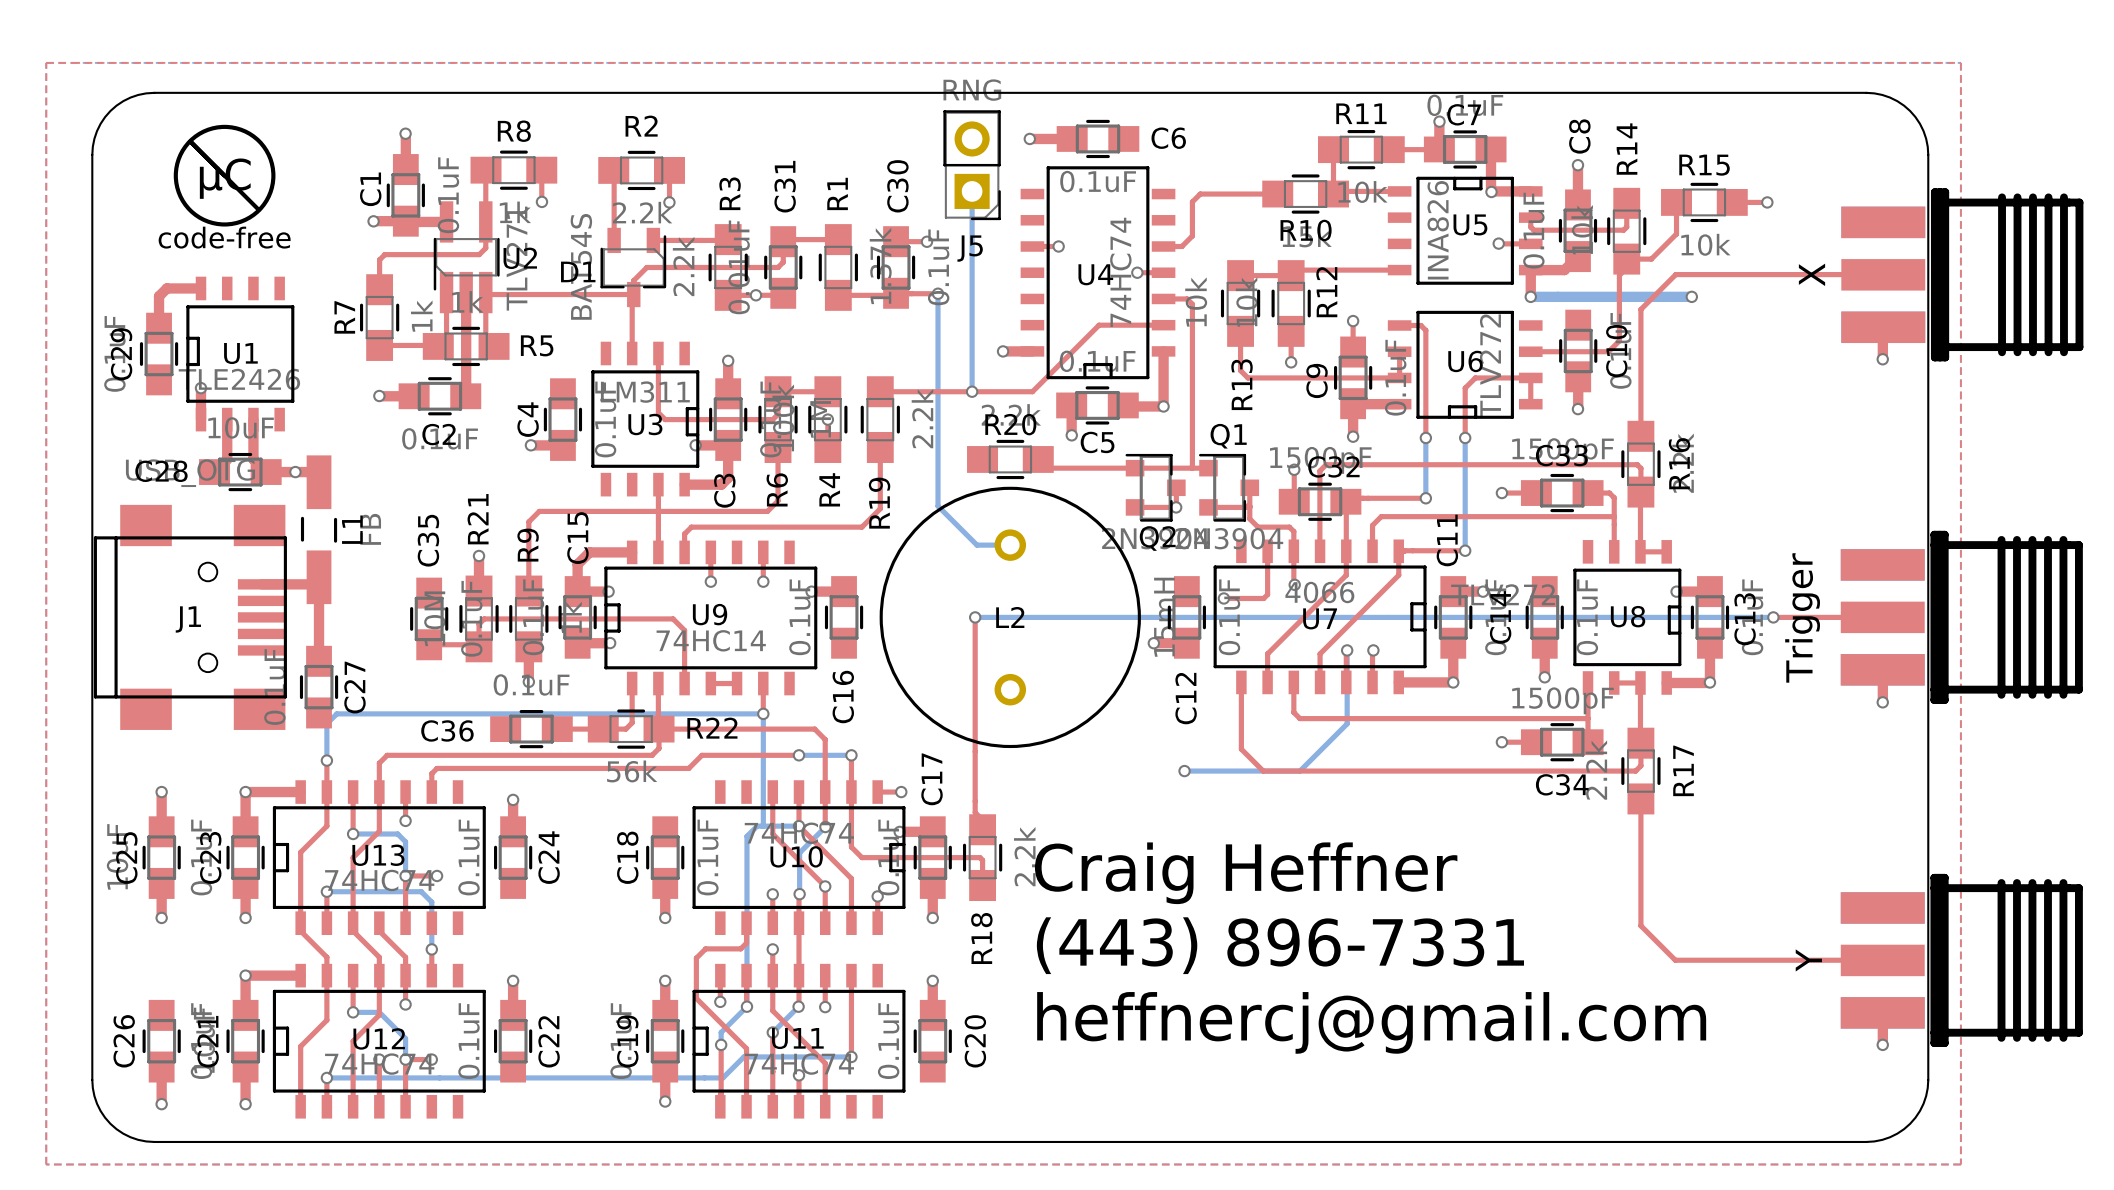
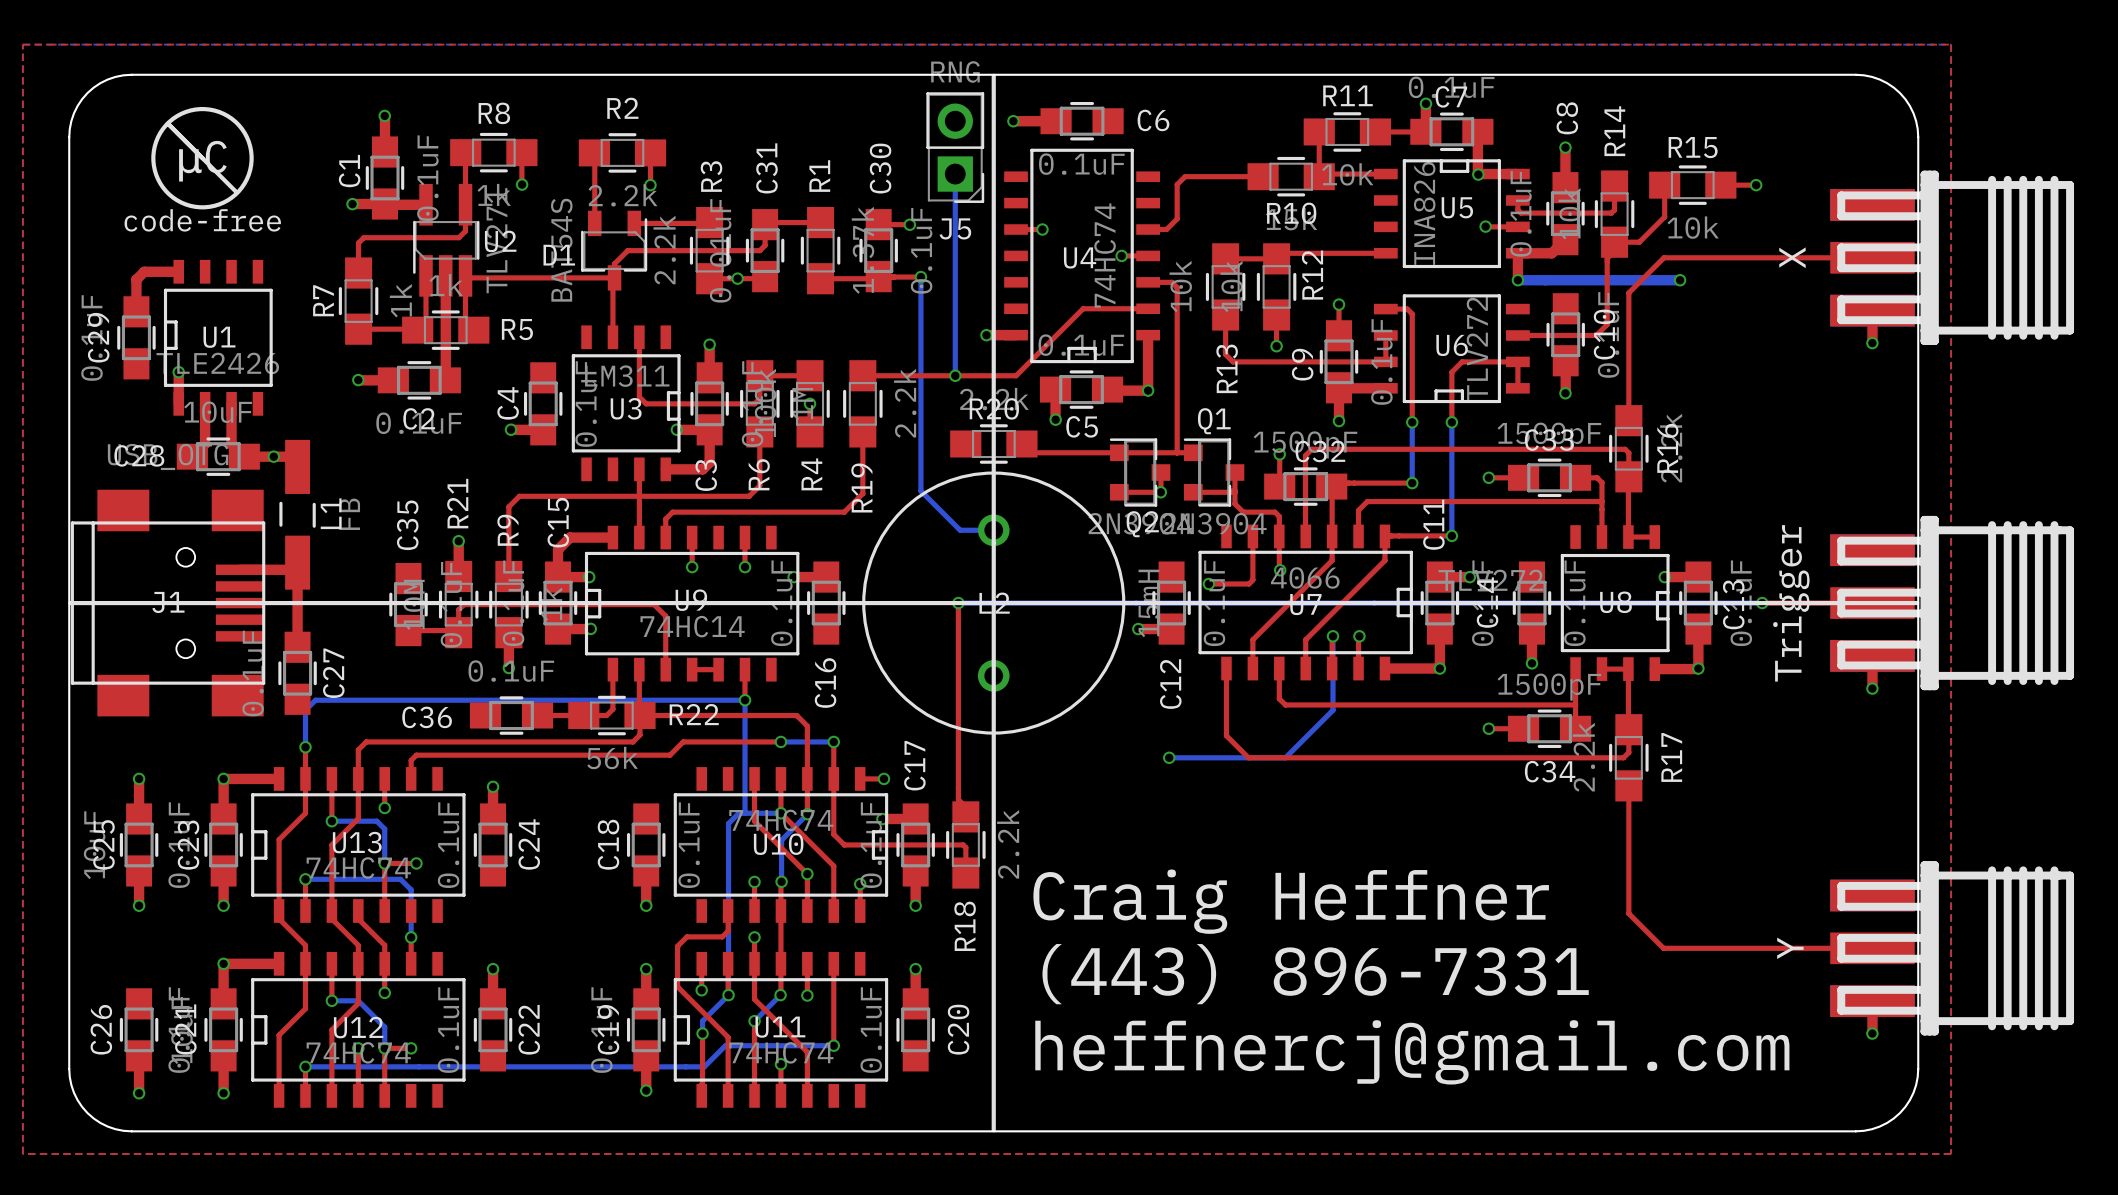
line: none -> (993, 75) (993, 542)
X footprint: [1841, 188, 2084, 362] -> [1830, 170, 2075, 345]
Trigger footprint: [1840, 530, 2083, 704] -> [1830, 515, 2075, 691]
line: none -> (993, 543) (993, 1130)
line: none -> (70, 603) (1917, 603)
text position: Craig Heffner (1246, 873) -> Craig Heffner (1291, 901)
Y footprint: [1840, 873, 2083, 1047] -> [1830, 861, 2075, 1036]
text position: (443) 896-7331 (1280, 945) -> (443) 896-7331 (1315, 974)
text position: heffnercj@gmail.com (1371, 1022) -> heffnercj@gmail.com (1412, 1052)

